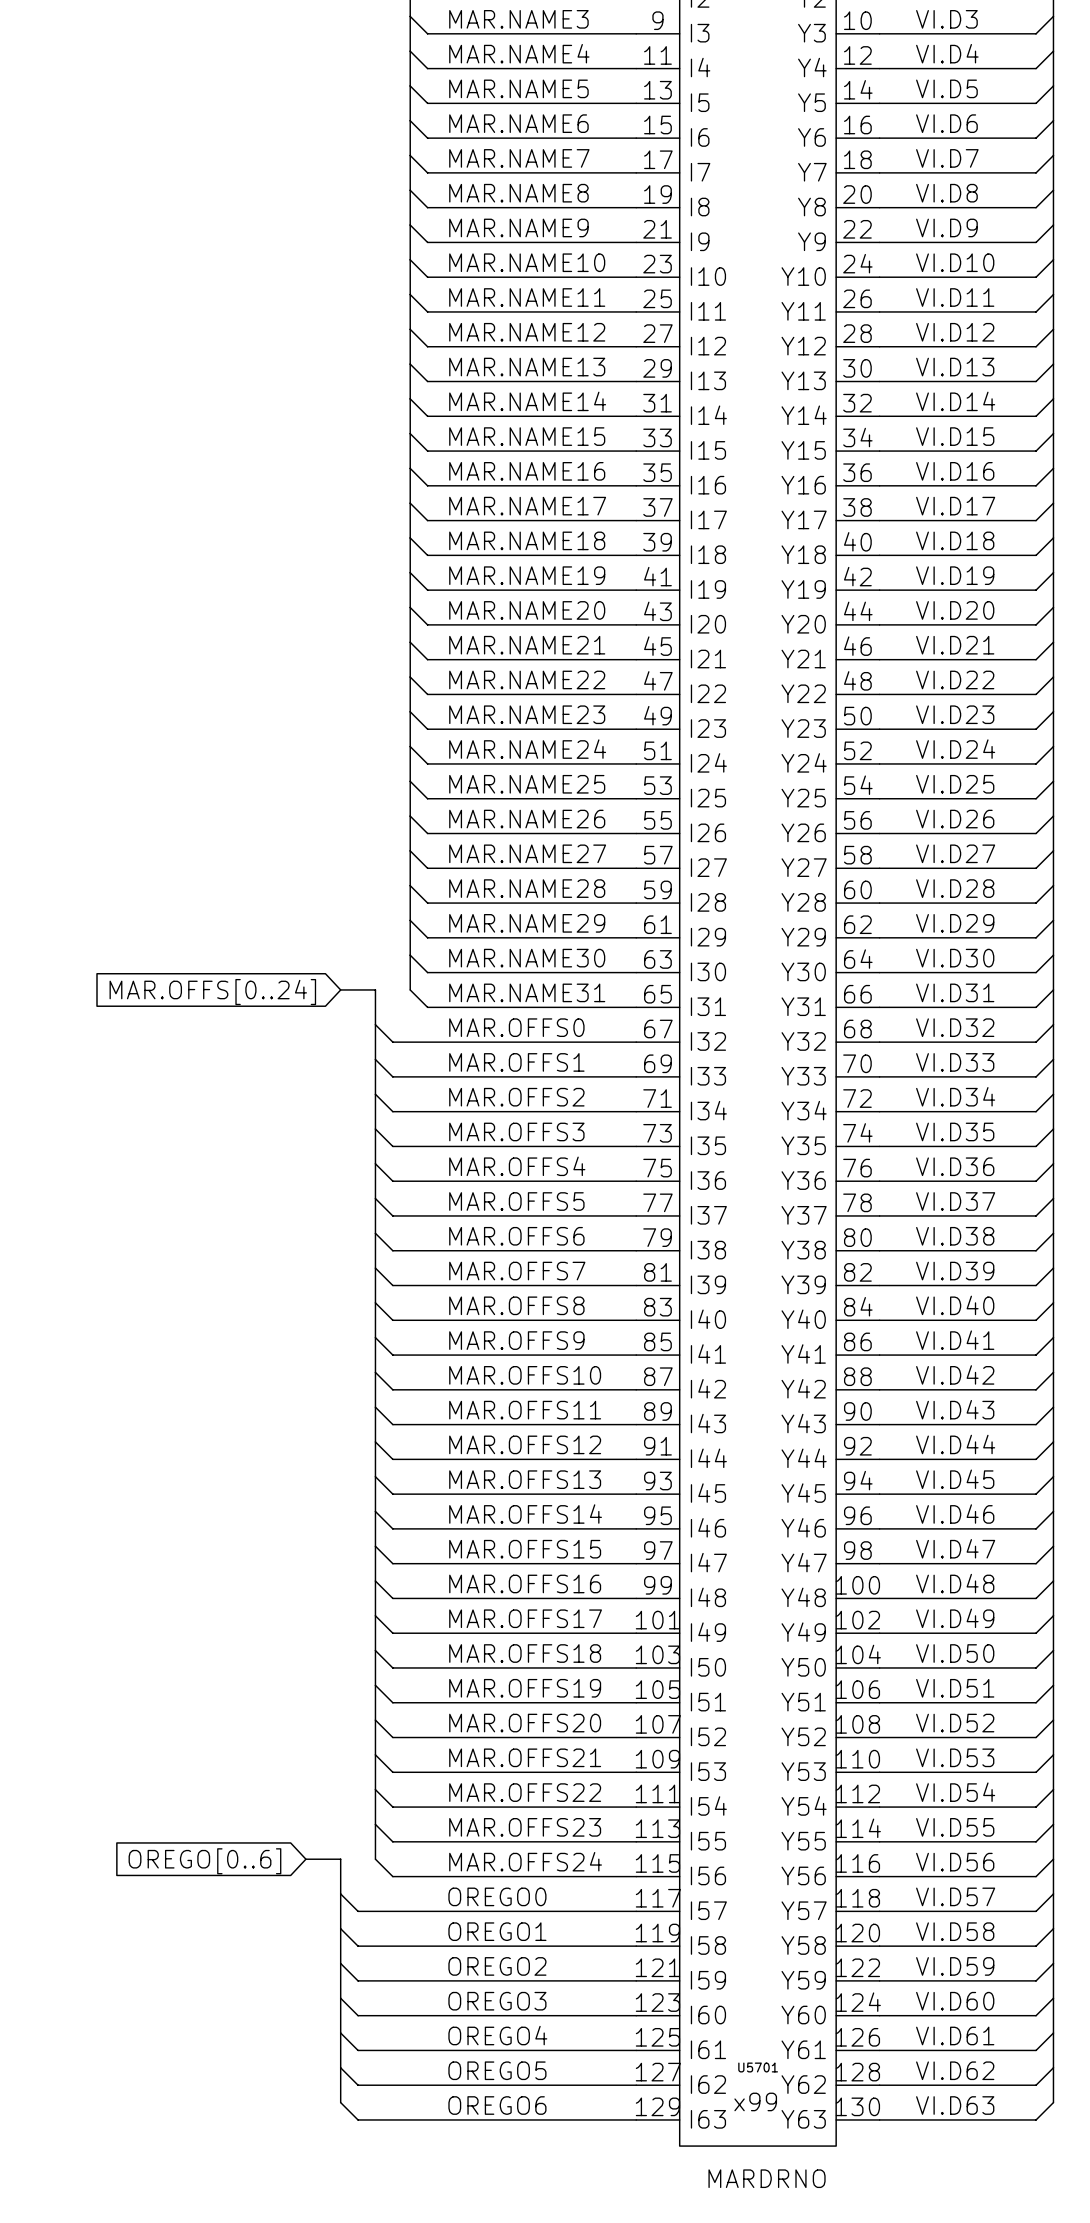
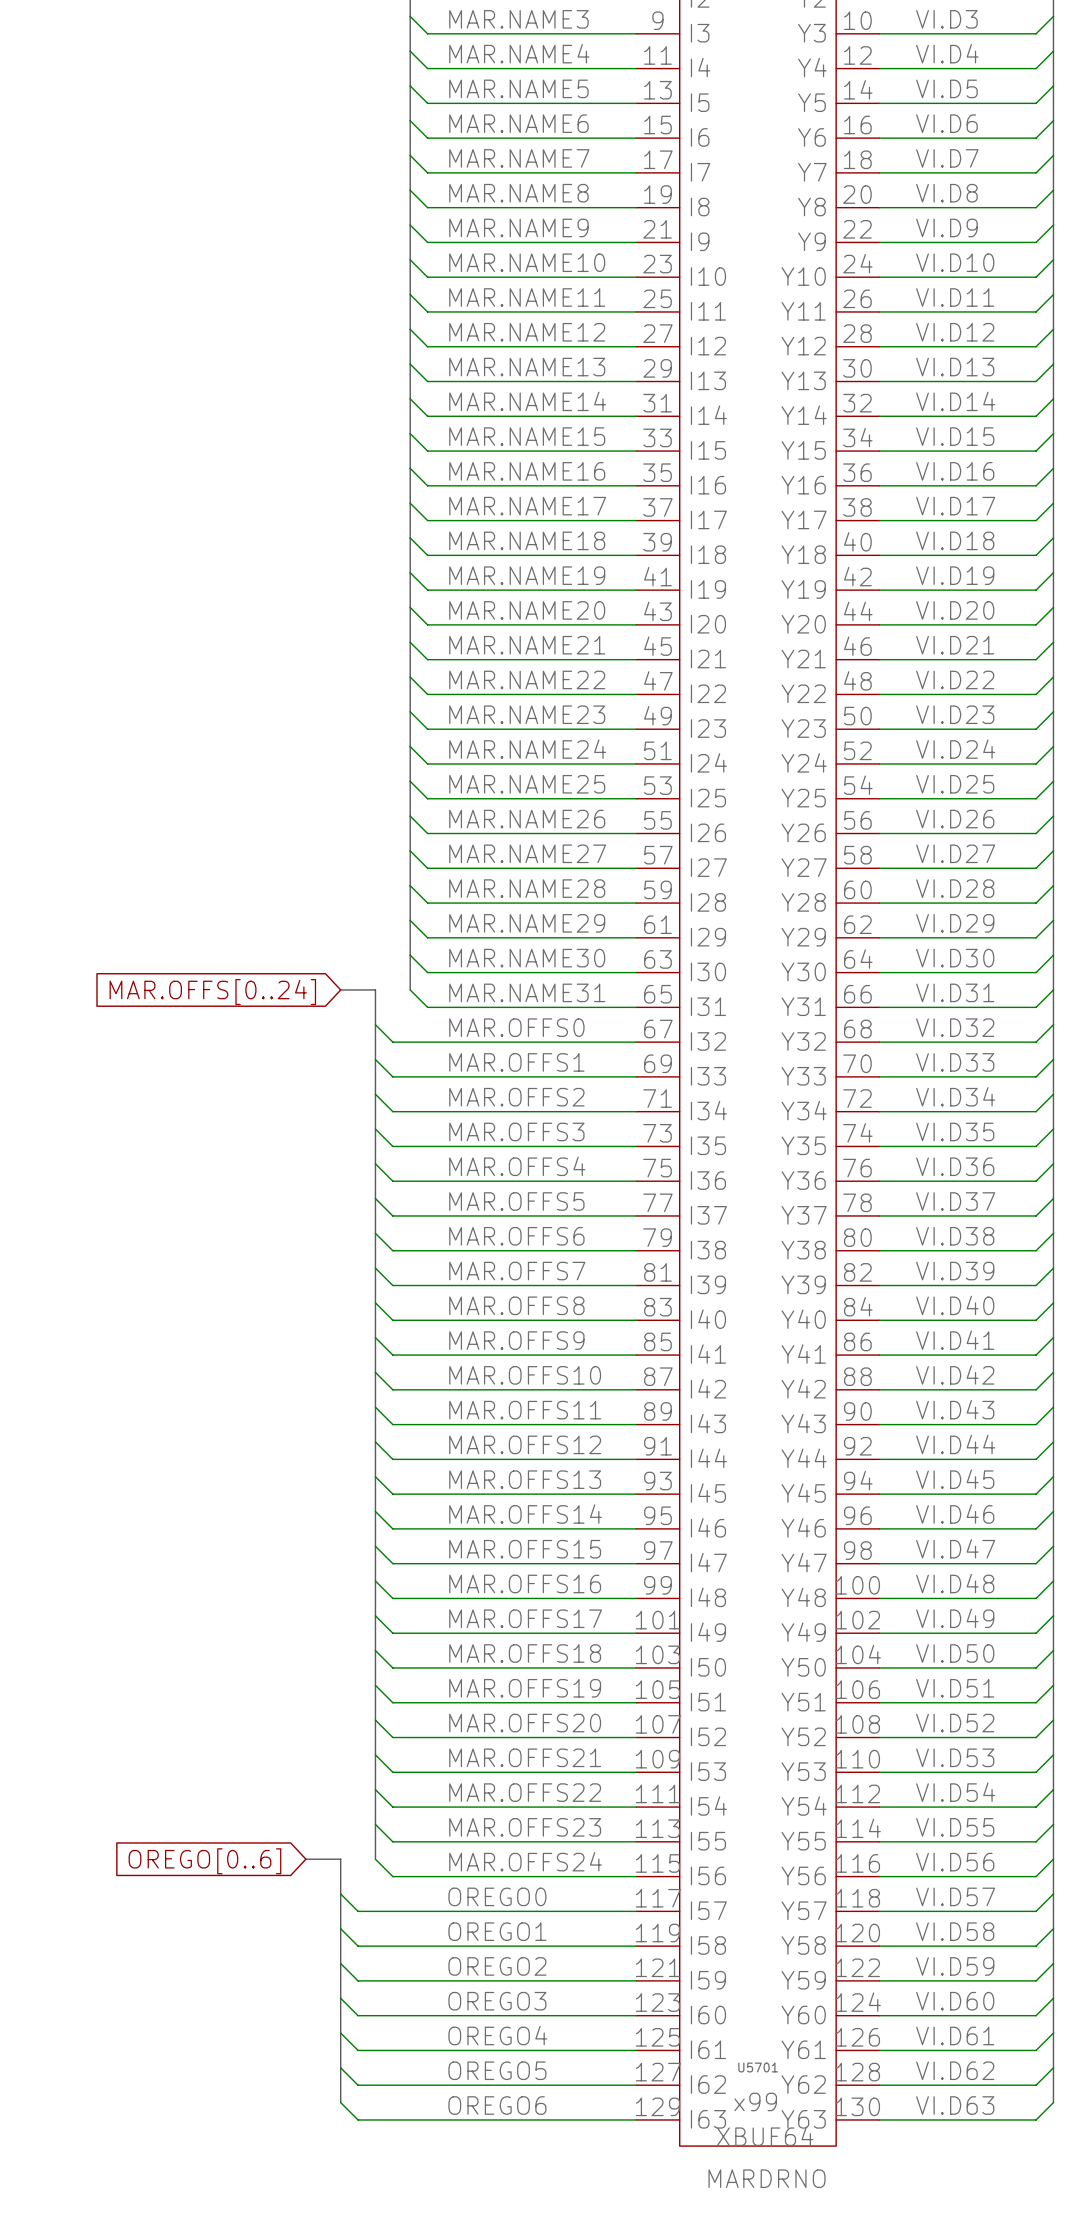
U5701 value: none -> XBUF64 (765, 2136)

